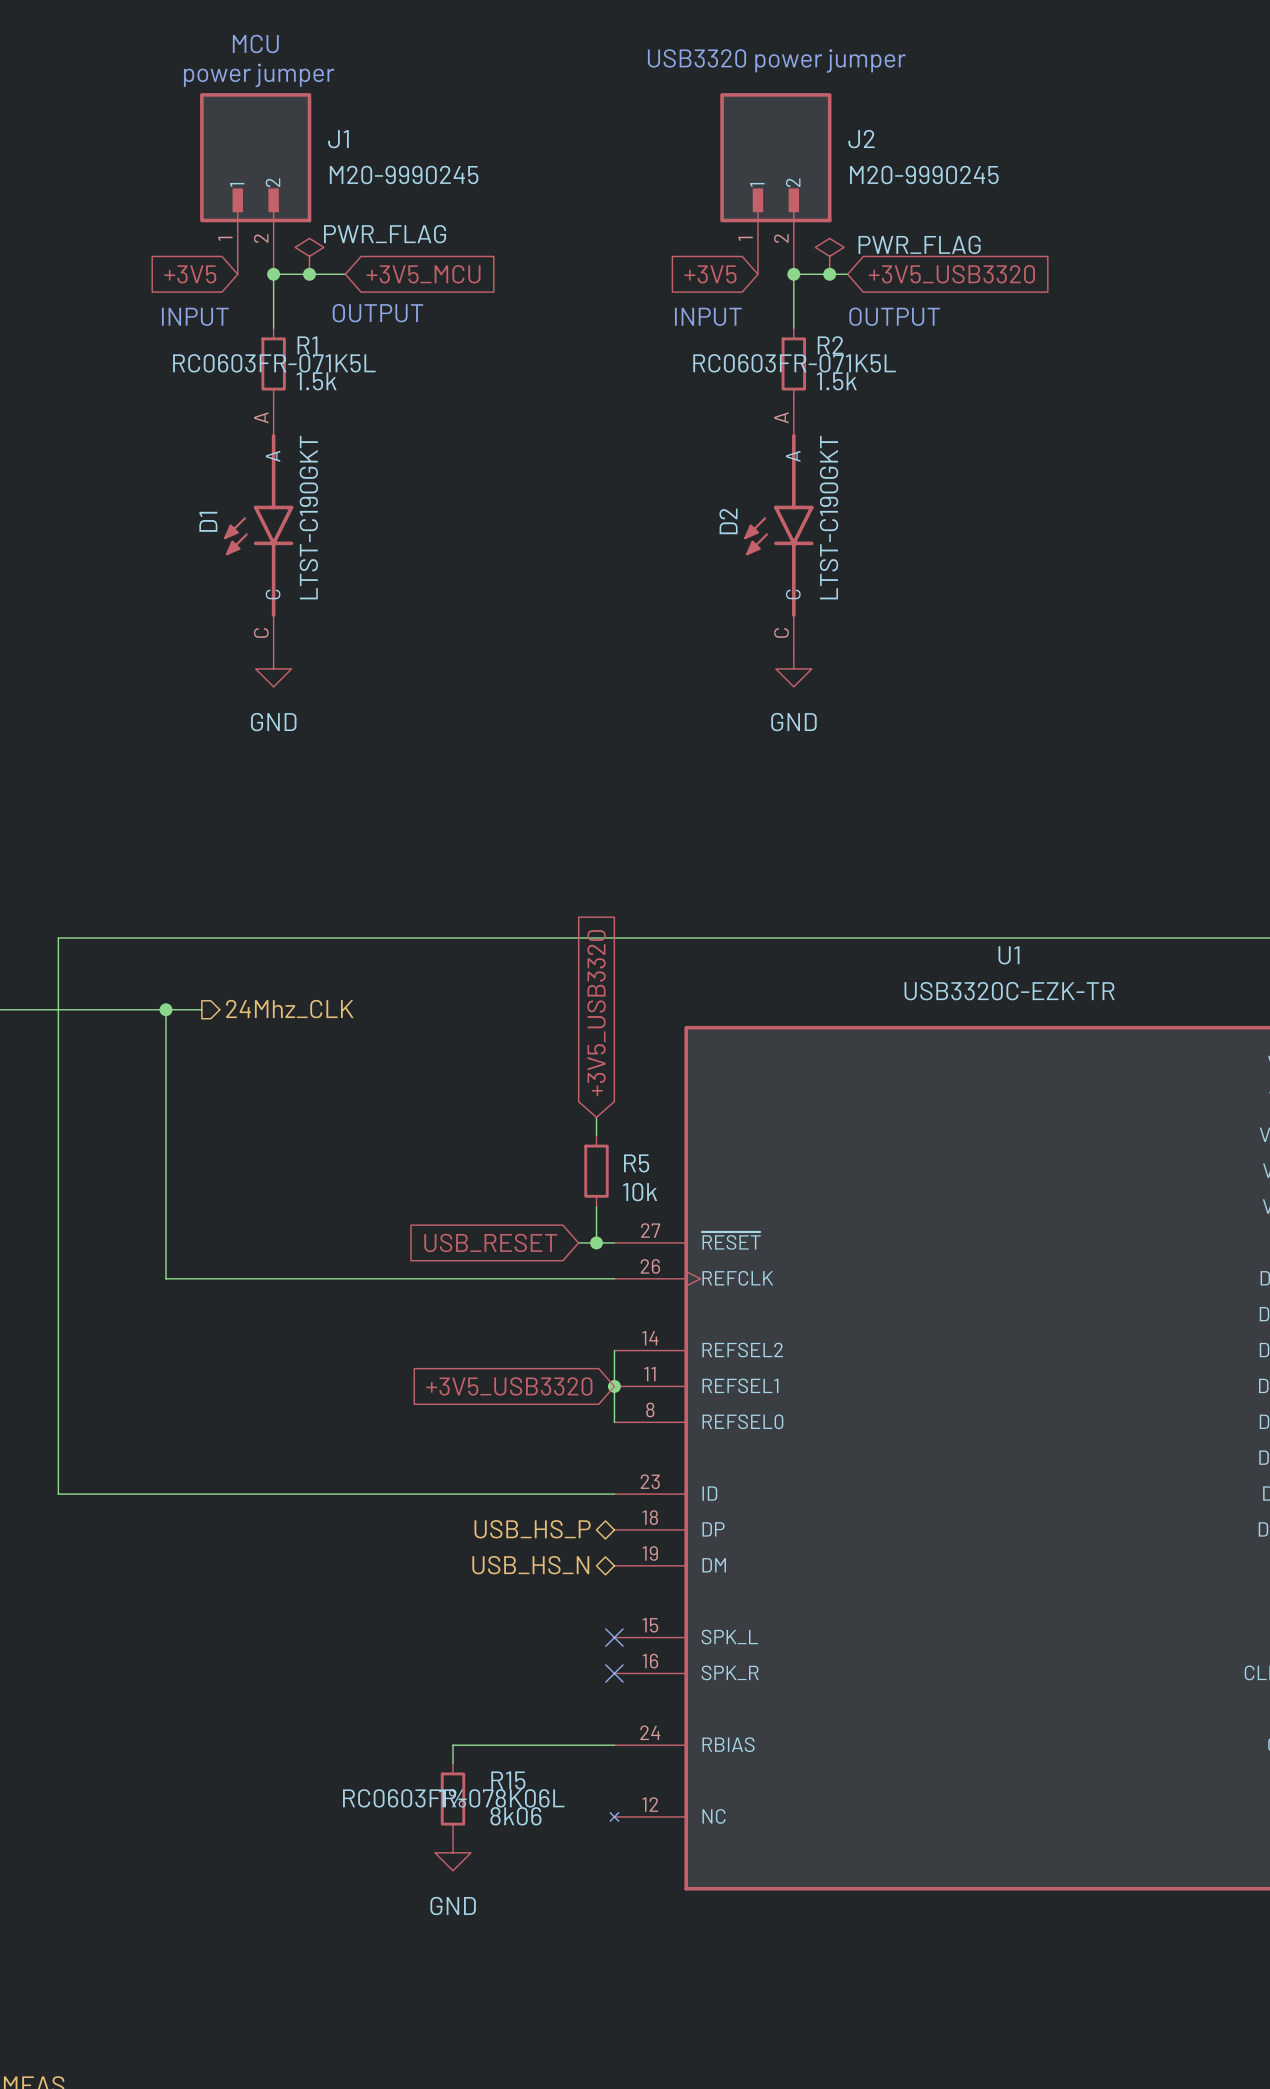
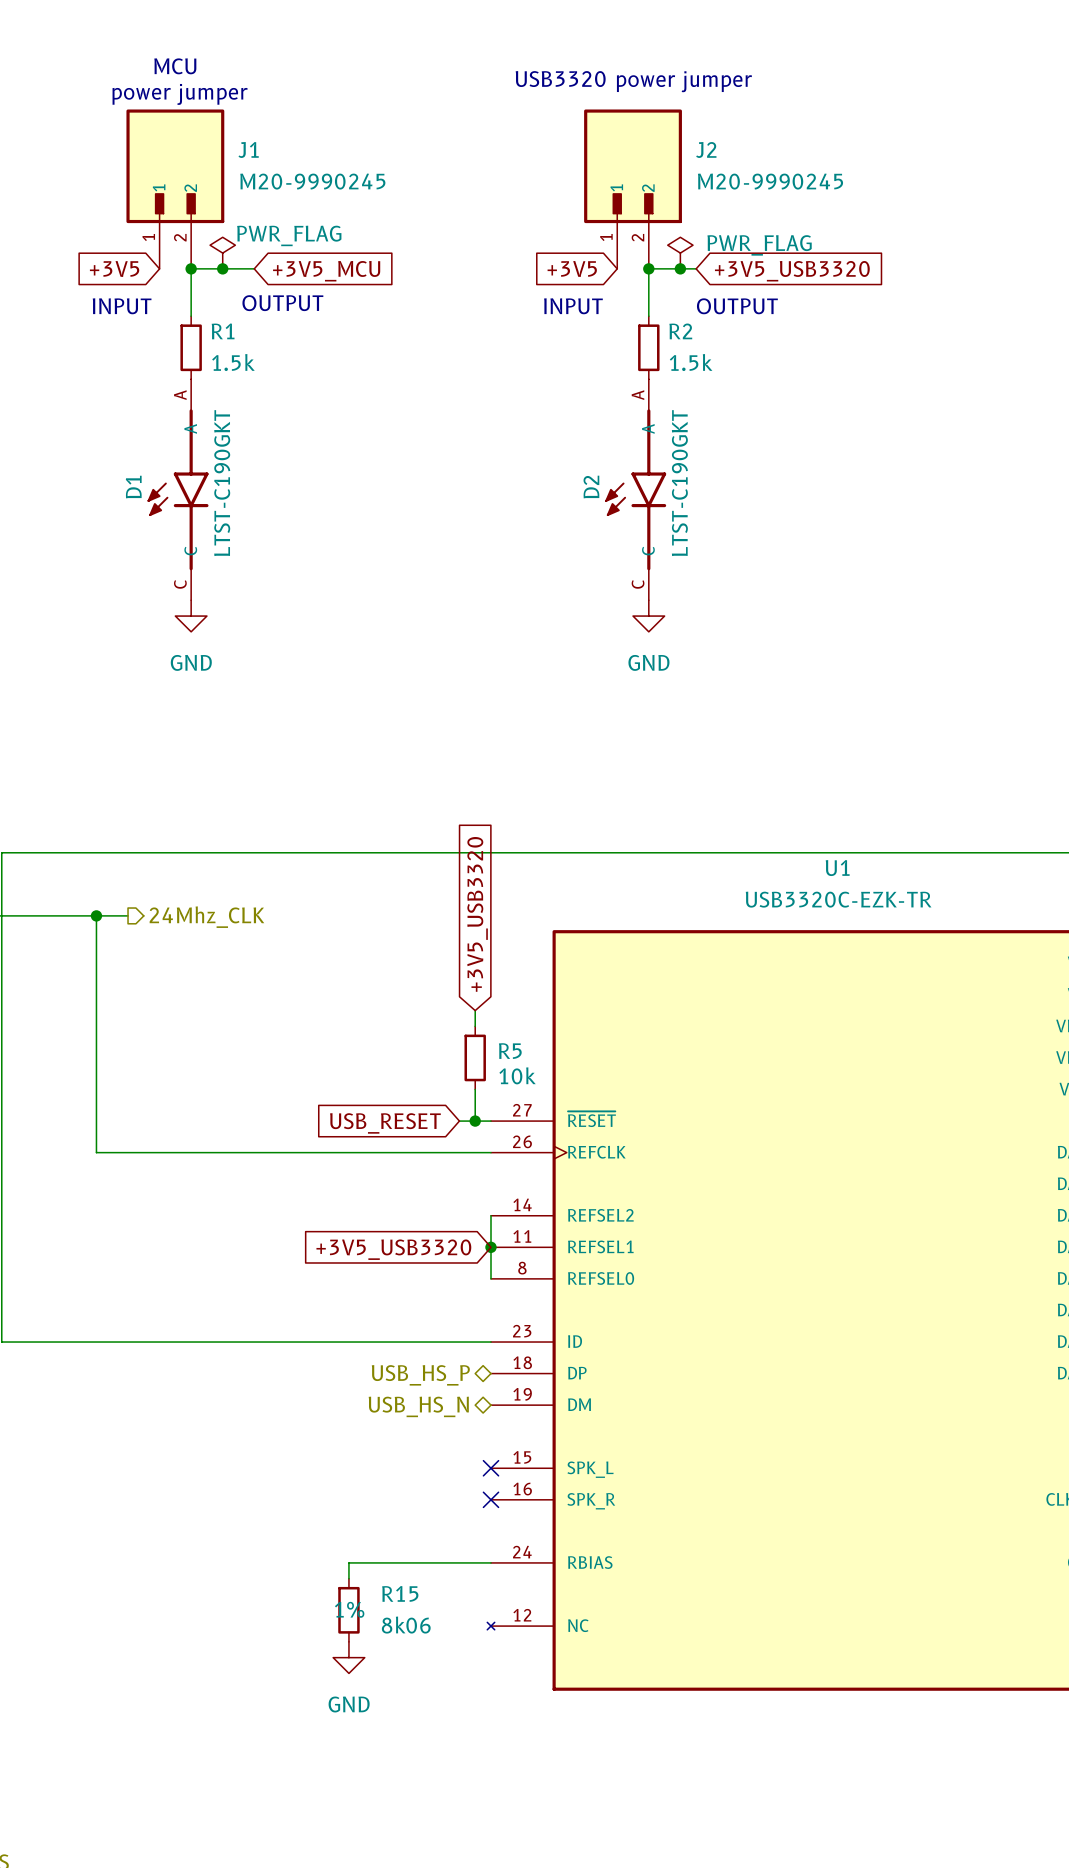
R1 text: RC0603FR-071K5L (274, 363) -> none
R2 text: RC0603FR-071K5L (794, 363) -> none
R15 text: RC0603FR-078K06L (453, 1798) -> none

